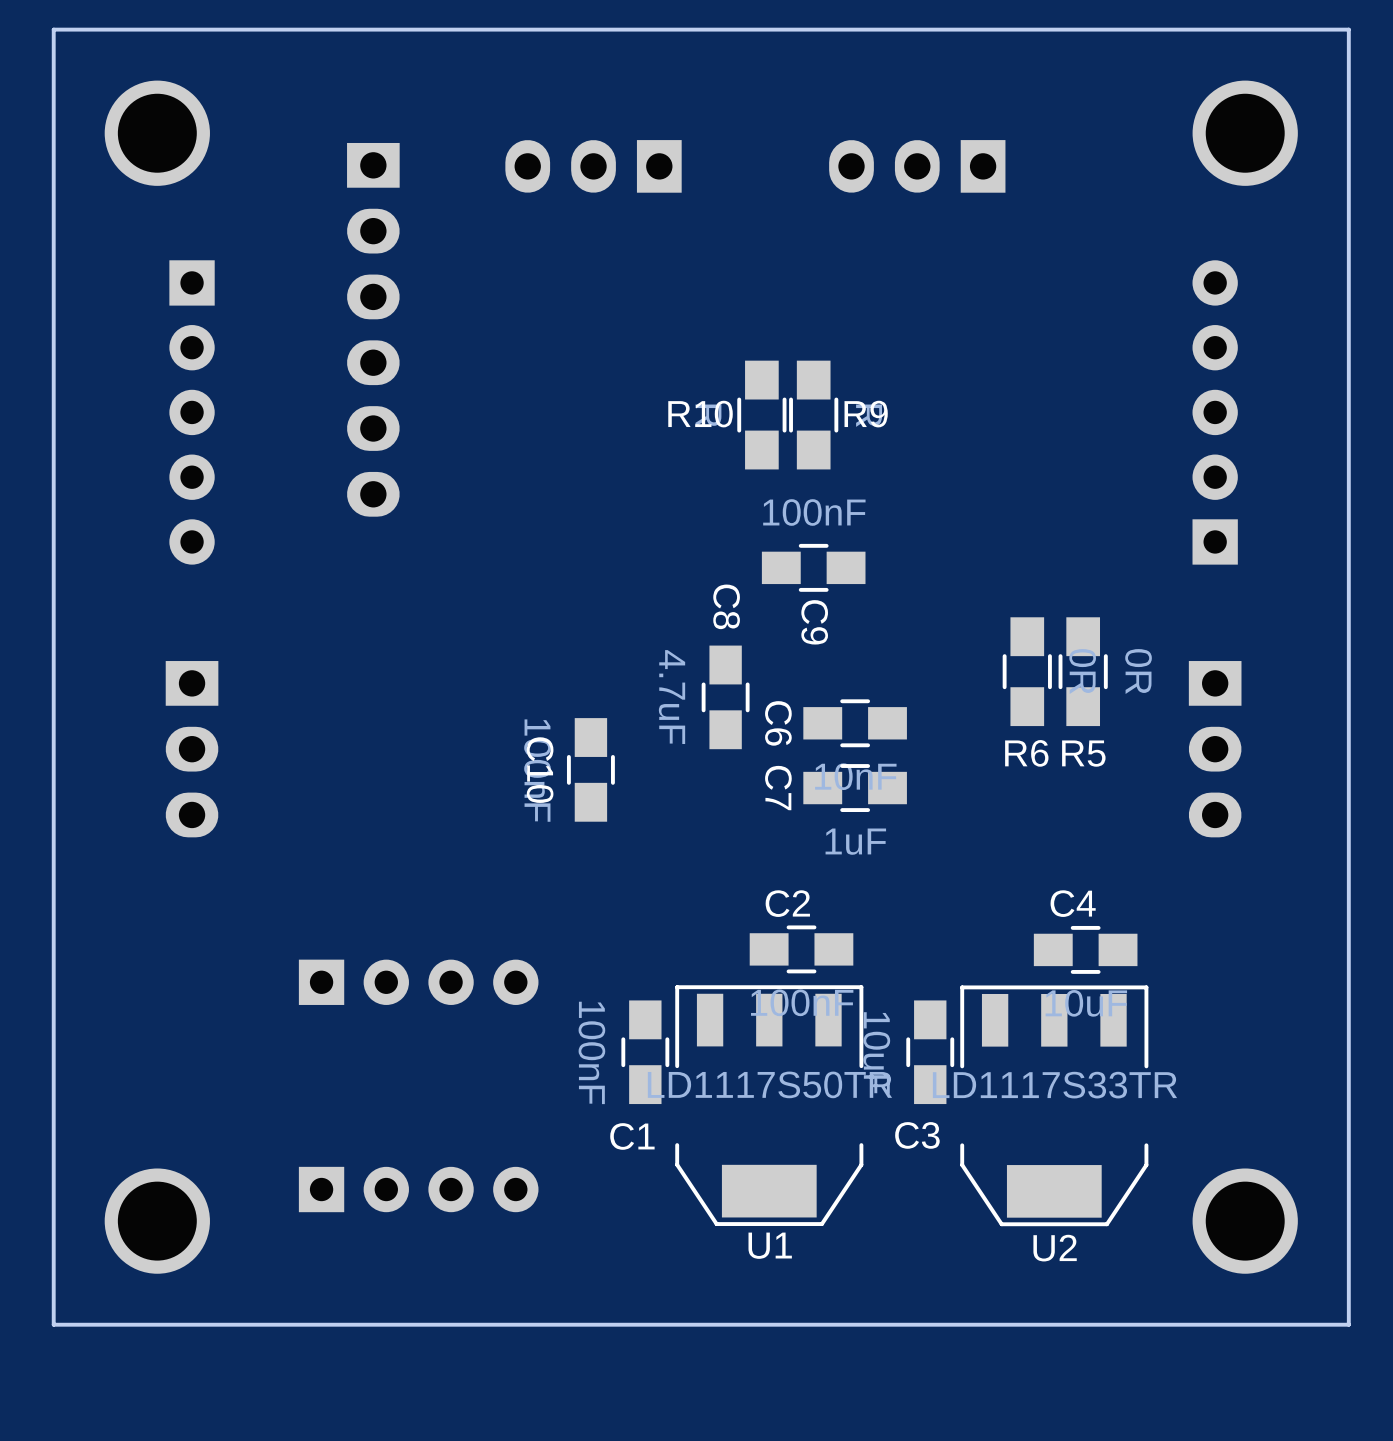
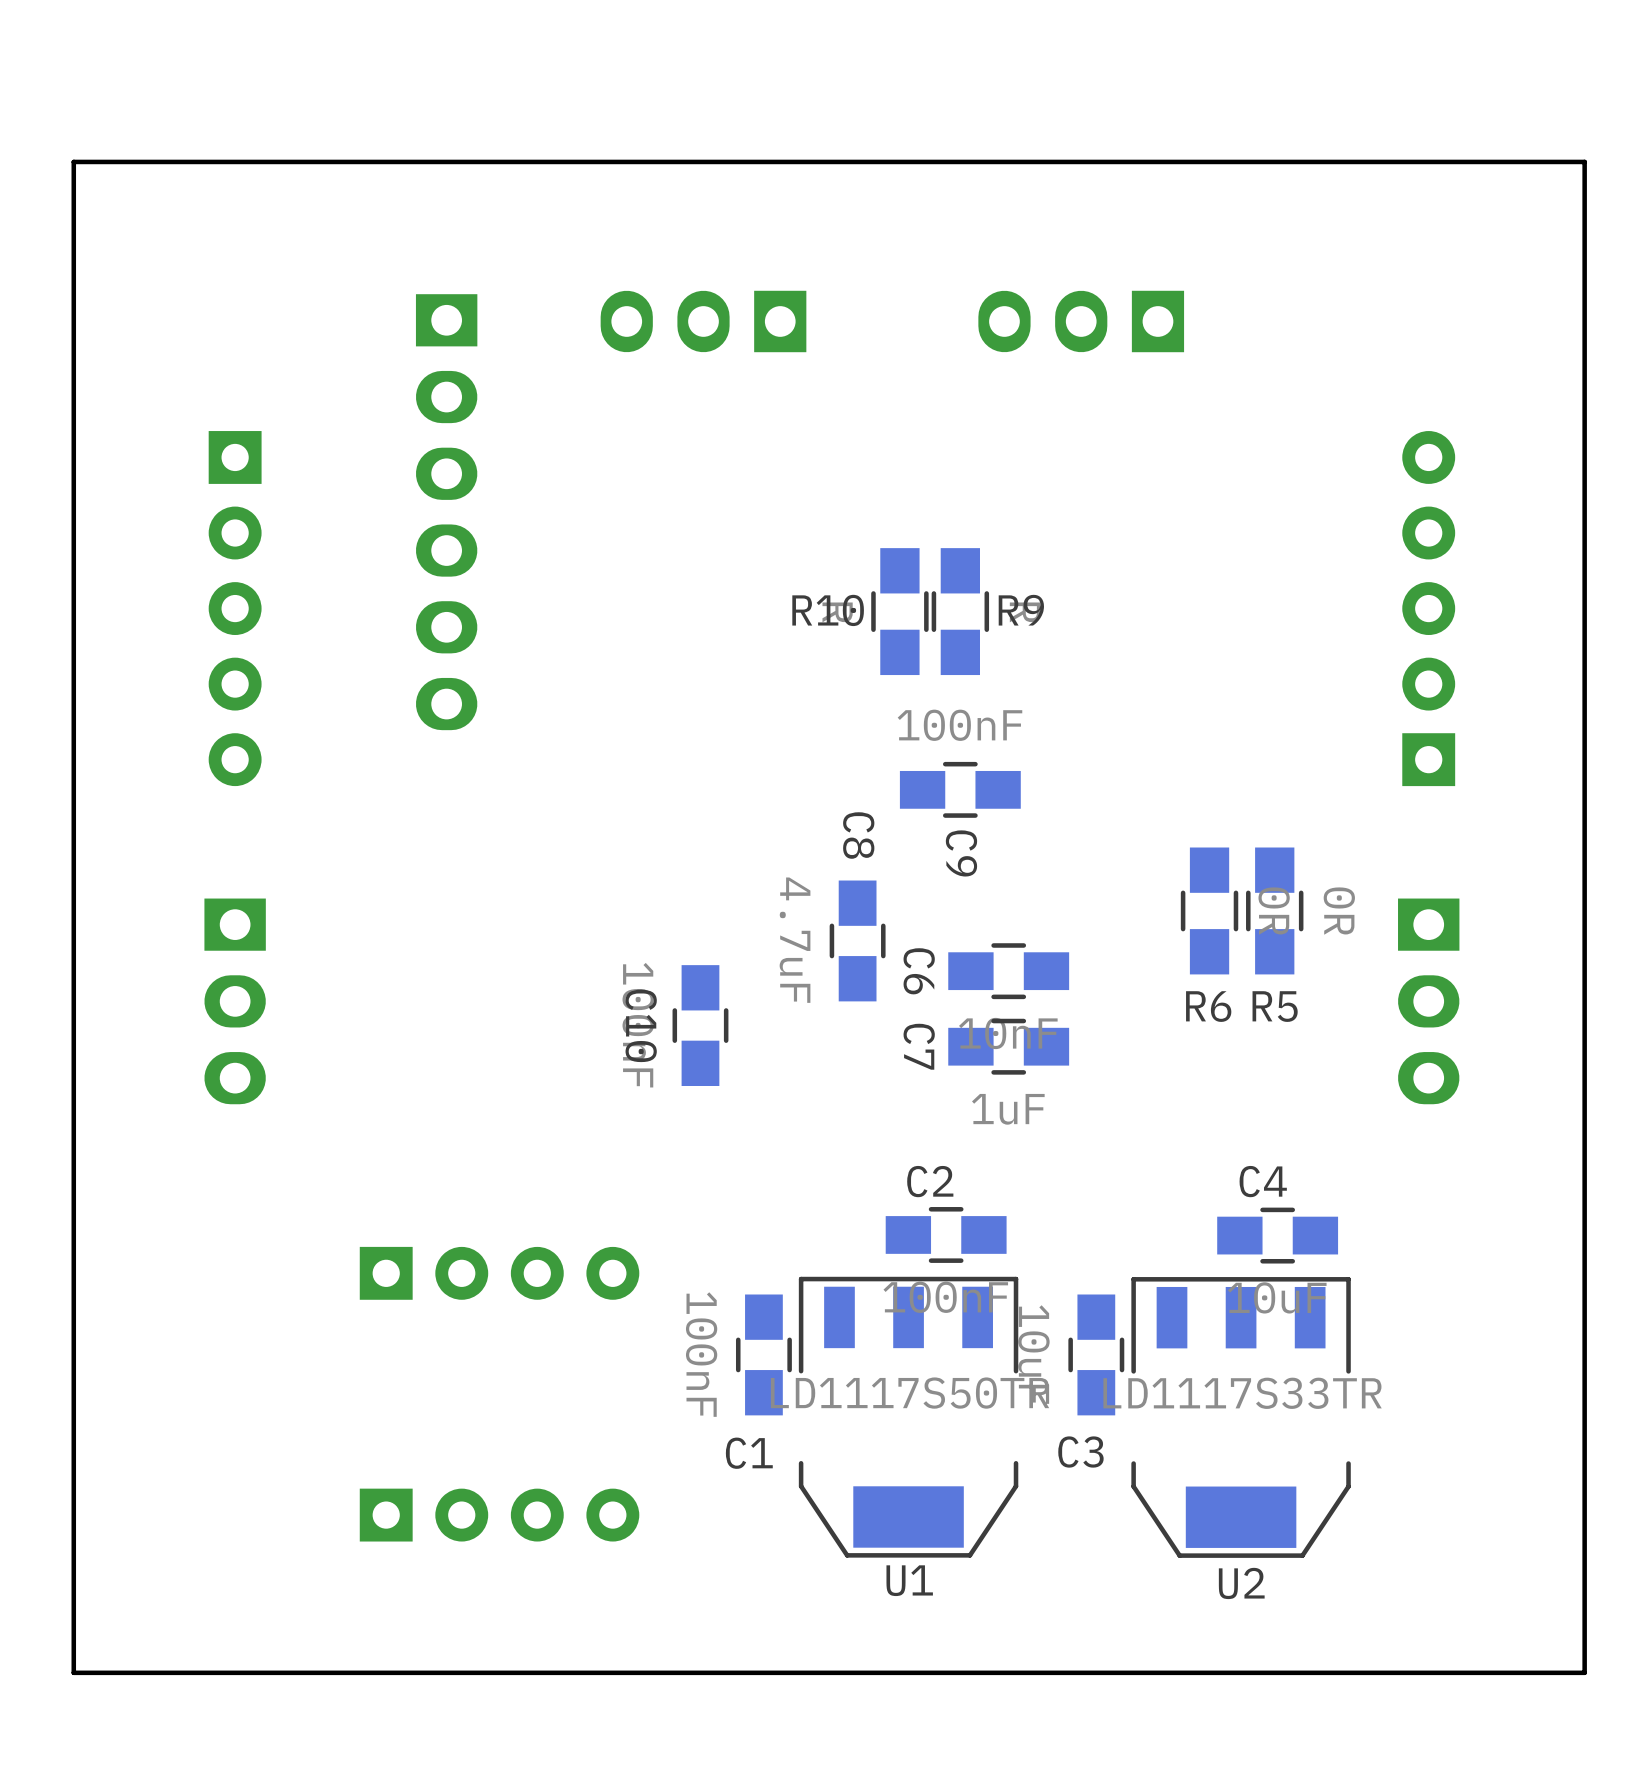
part: (157, 133) -> none
part: (1245, 133) -> none
part: (157, 1221) -> none
part: (1245, 1221) -> none

